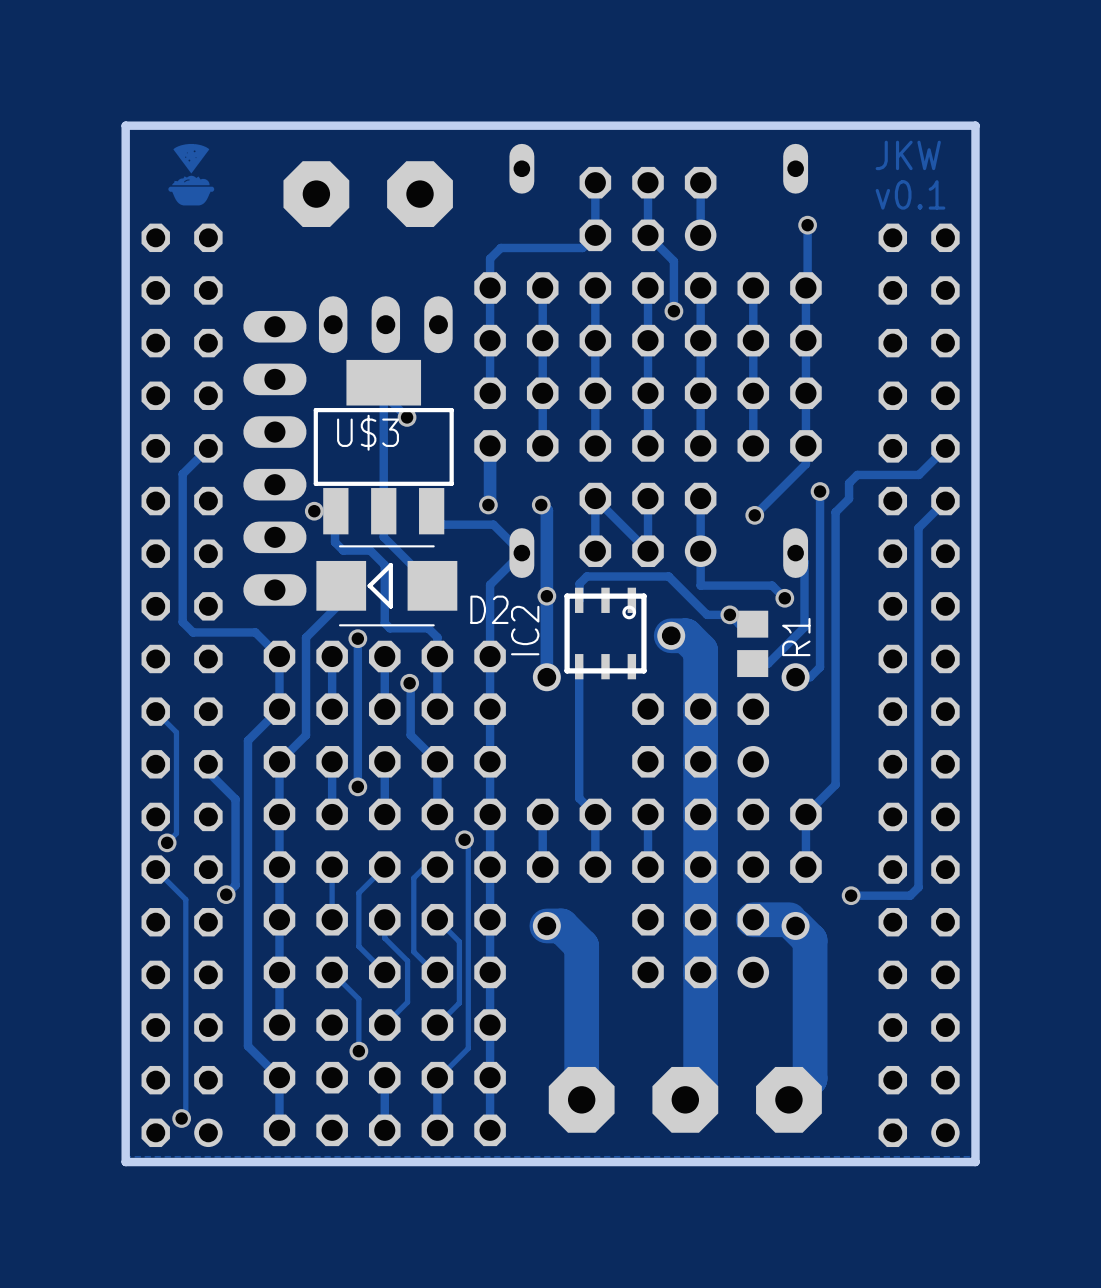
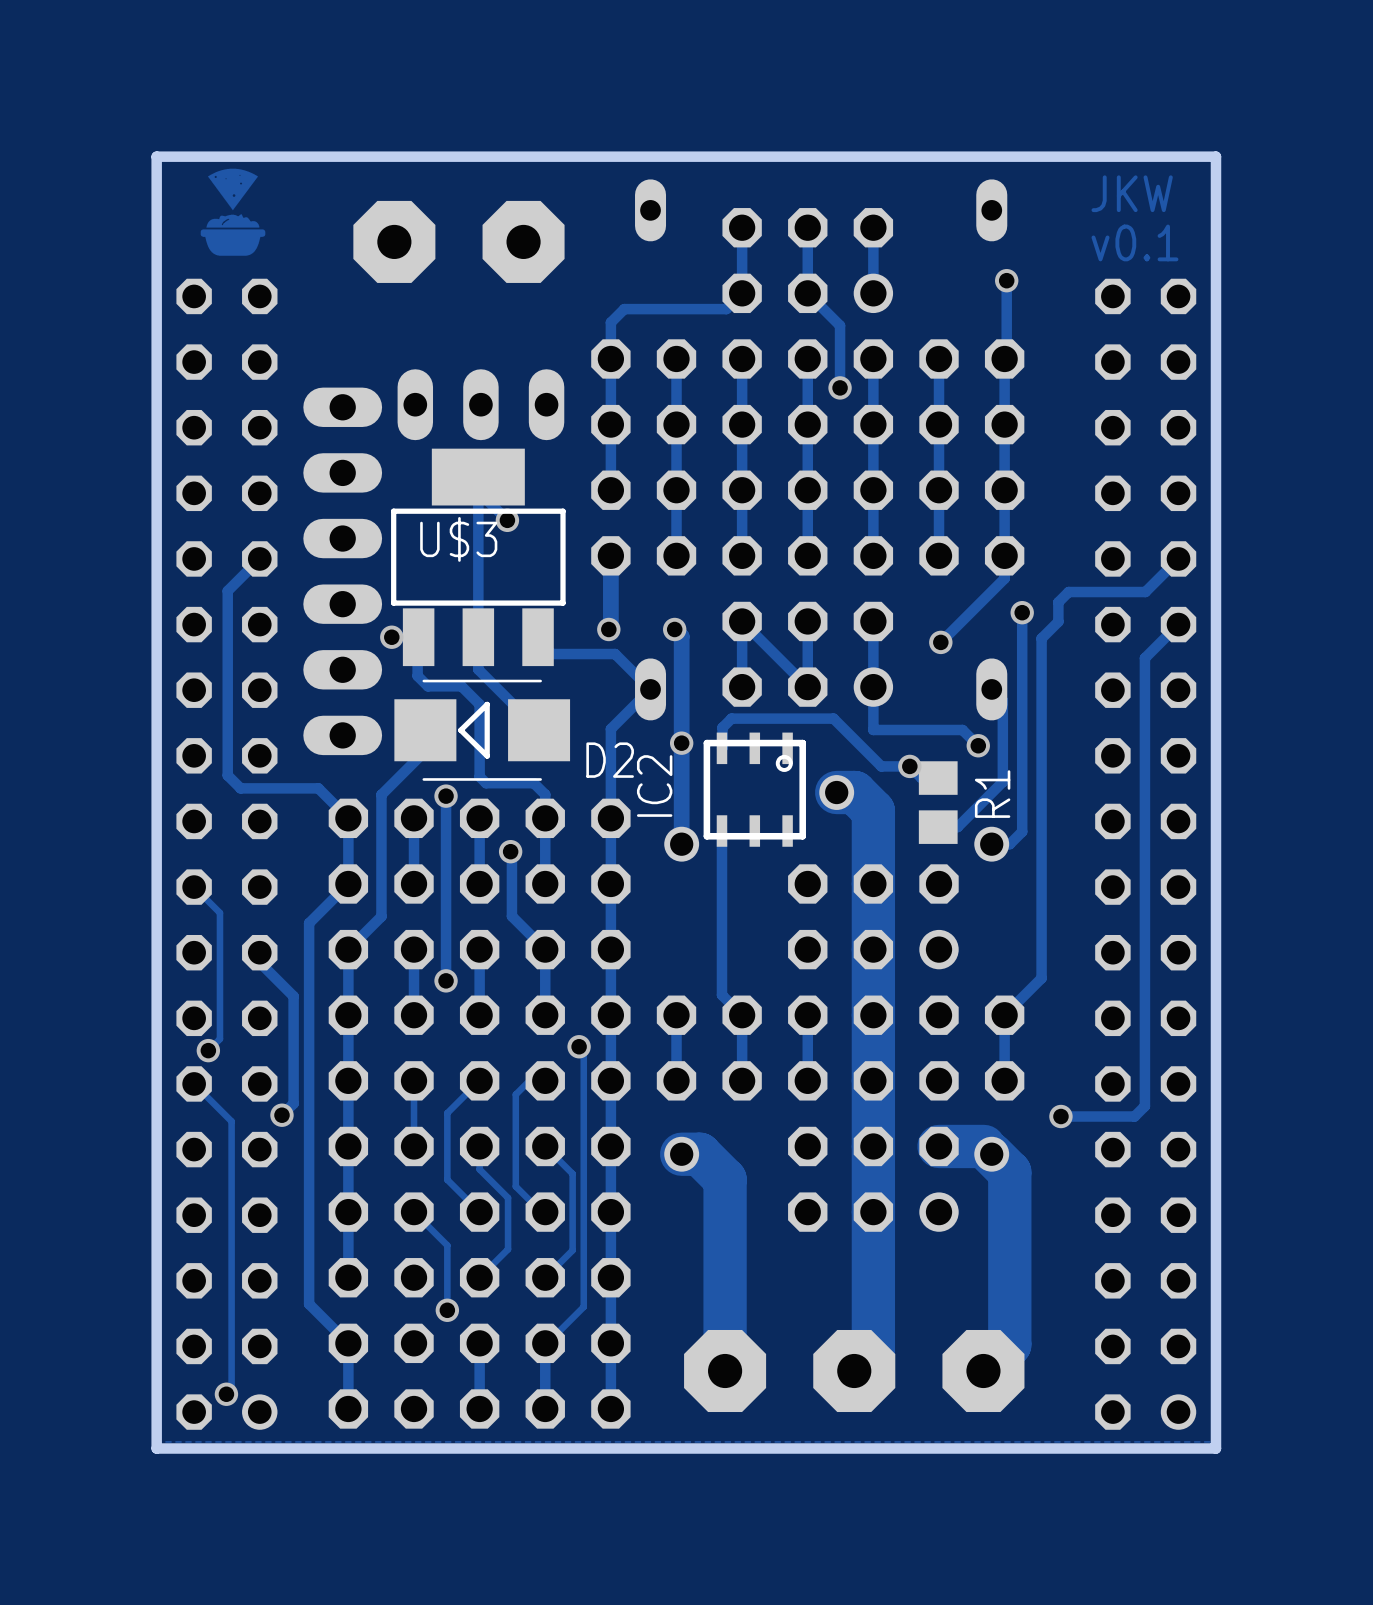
drawing shape: [168, 143, 215, 206] -> [200, 168, 266, 256]

